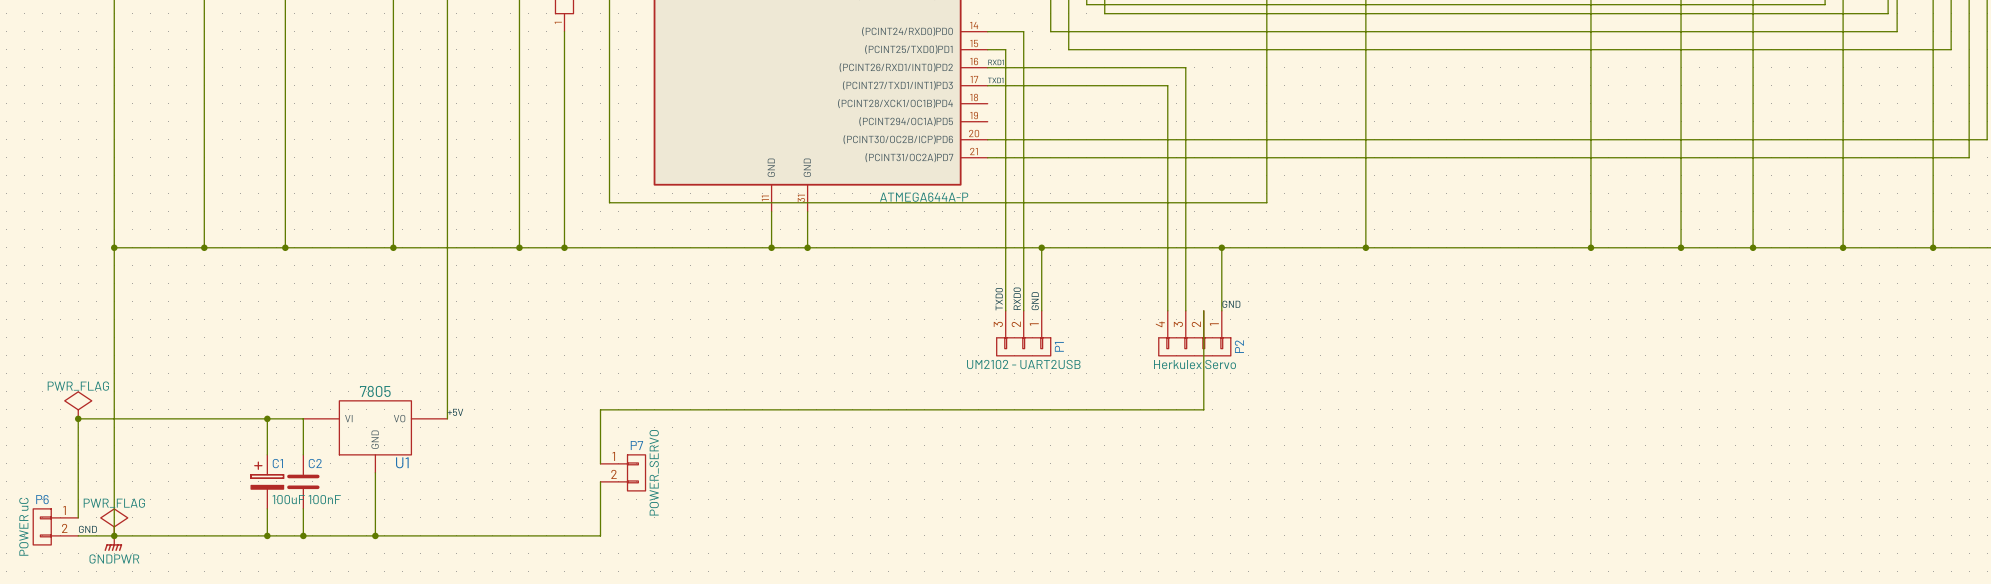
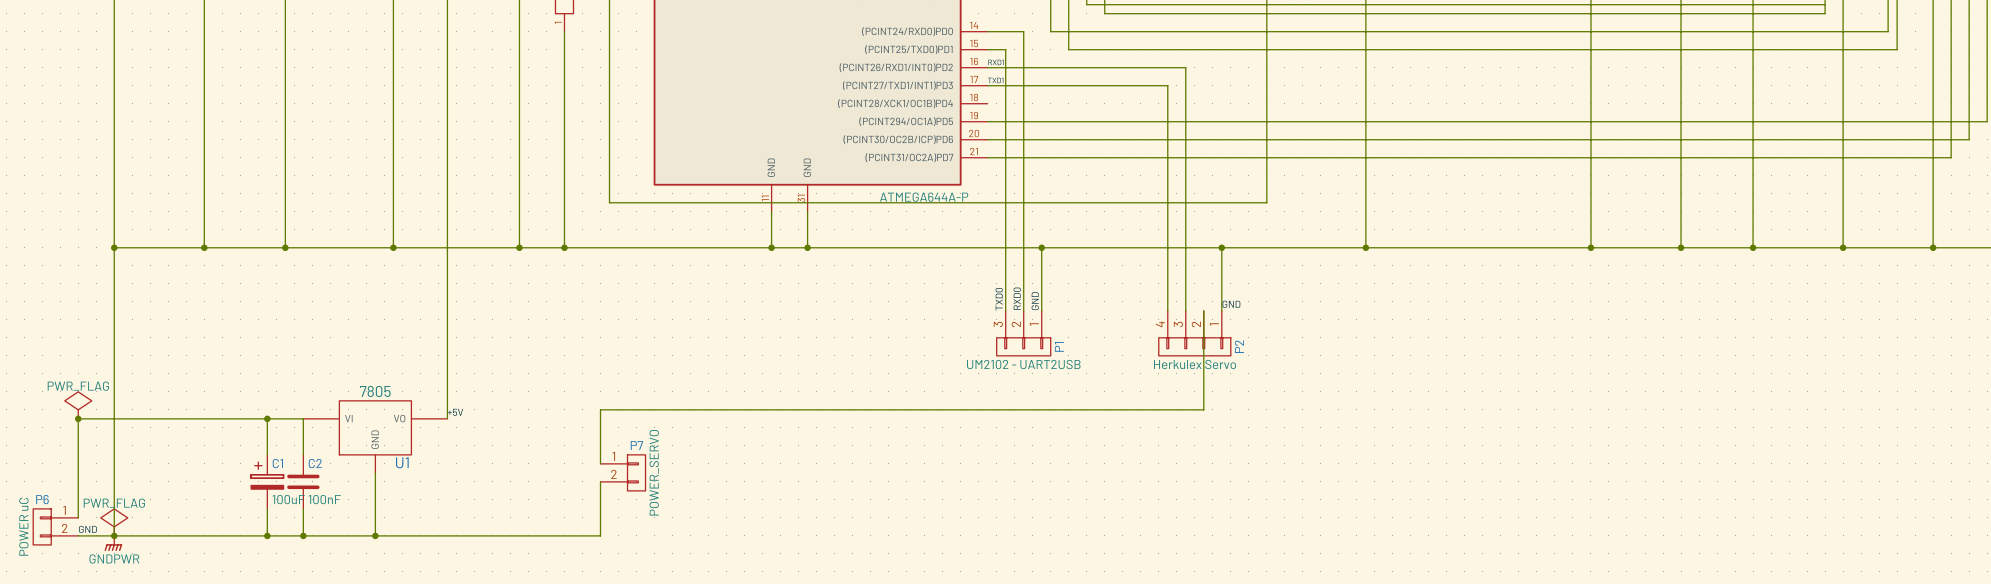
wire: (1825, 13) (1888, 13) -> (1825, 13) (1825, 4)
wire: none -> (1888, 13) (1888, 31)
wire: (1888, 31) (1897, 31) -> (1897, 49) (1897, 31)
wire: (1897, 49) (1951, 49) -> none
wire: none -> (987, 121) (1987, 121)
wire: (1987, 121) (1987, 139) (1969, 139) (1969, 157) (1951, 157) -> (1951, 49) (1951, 157)

